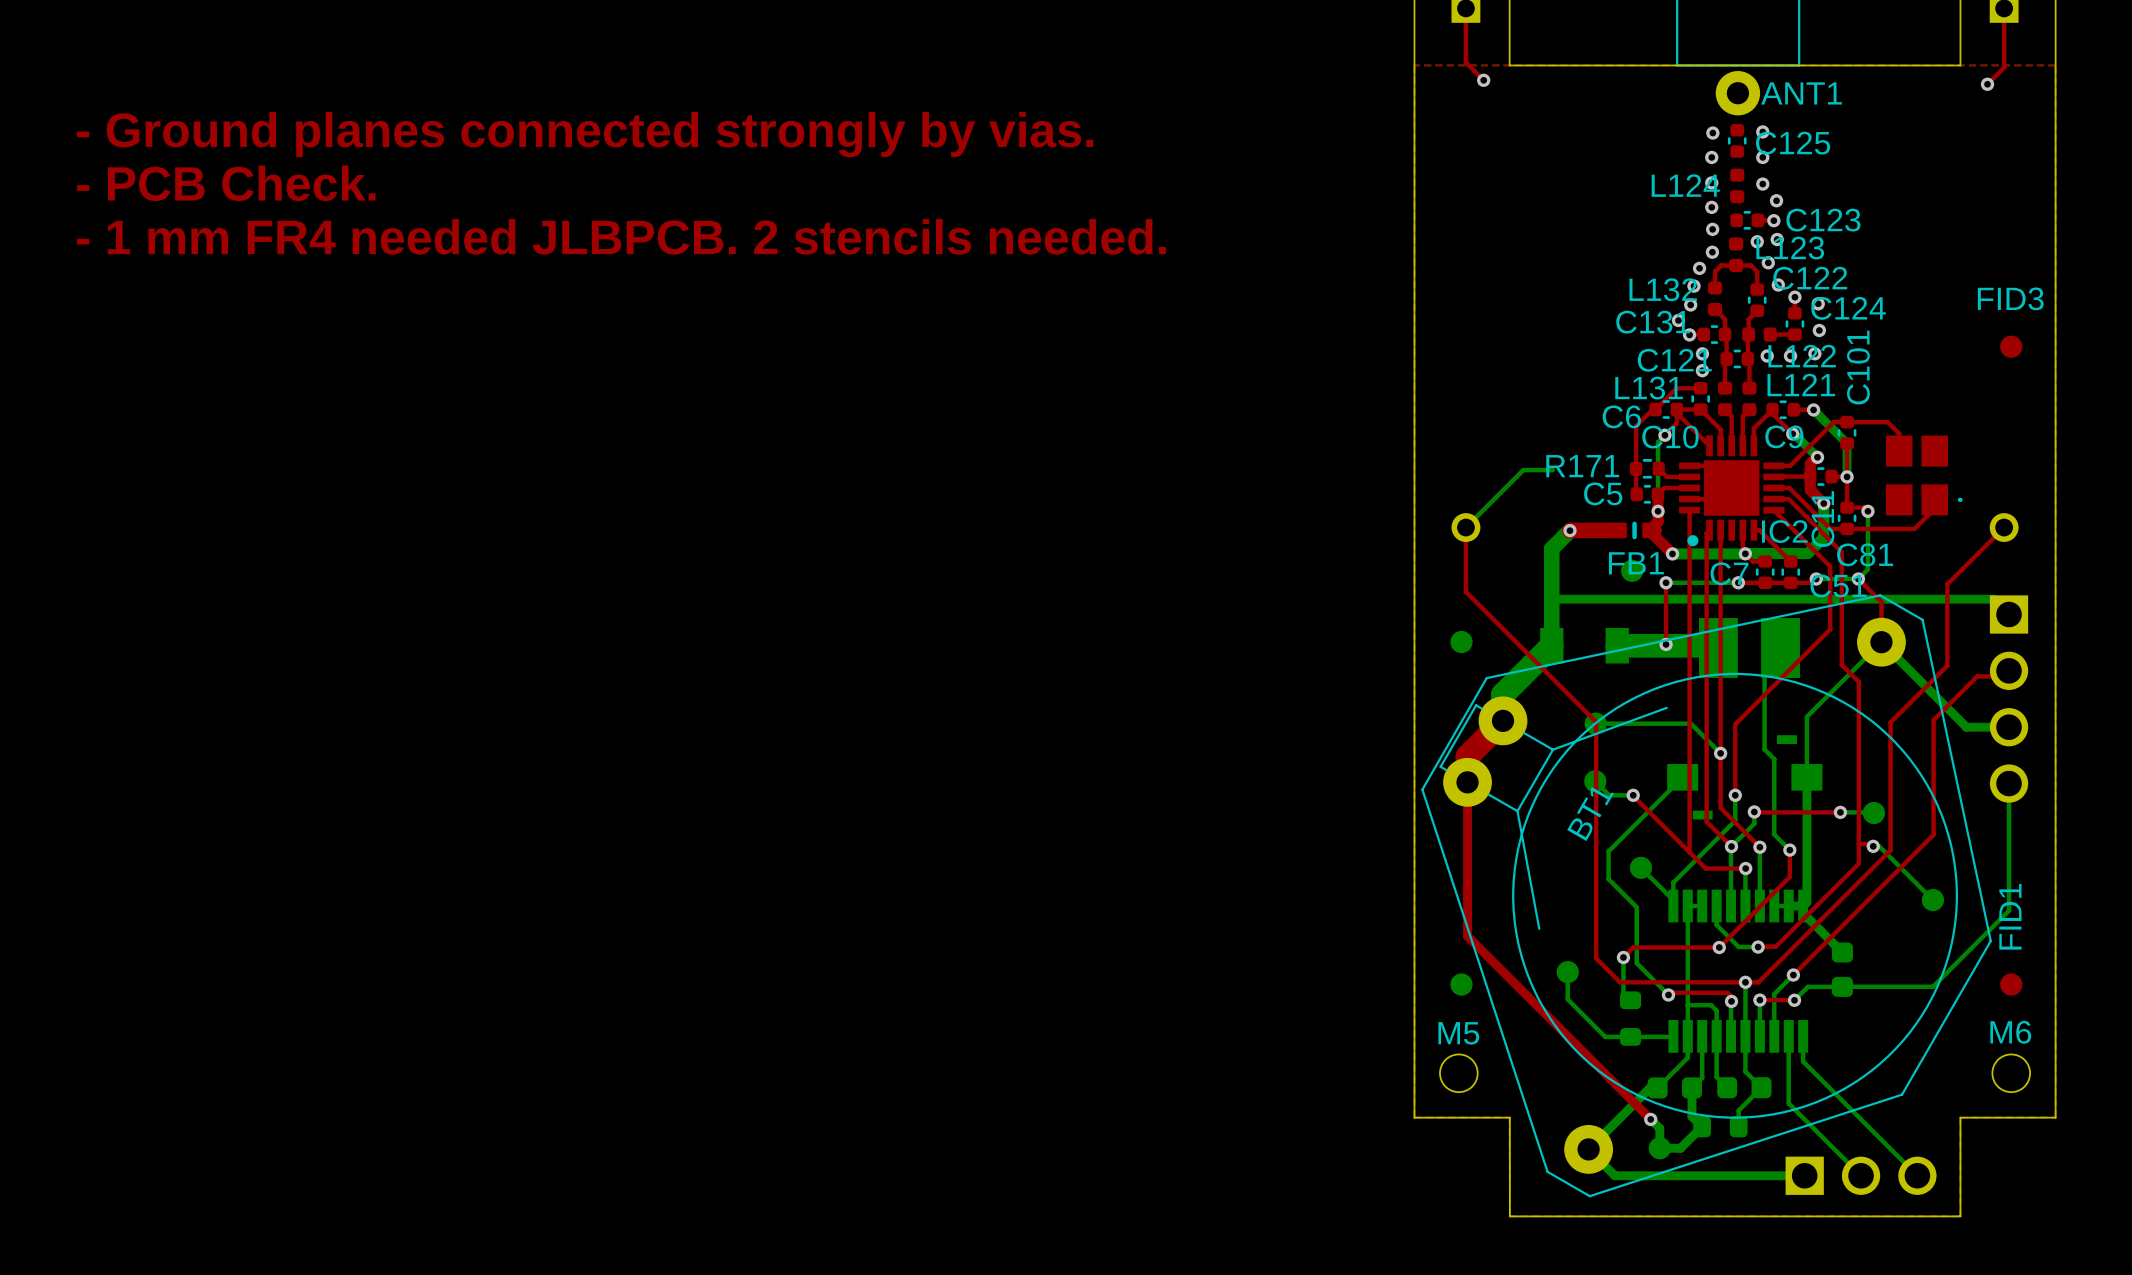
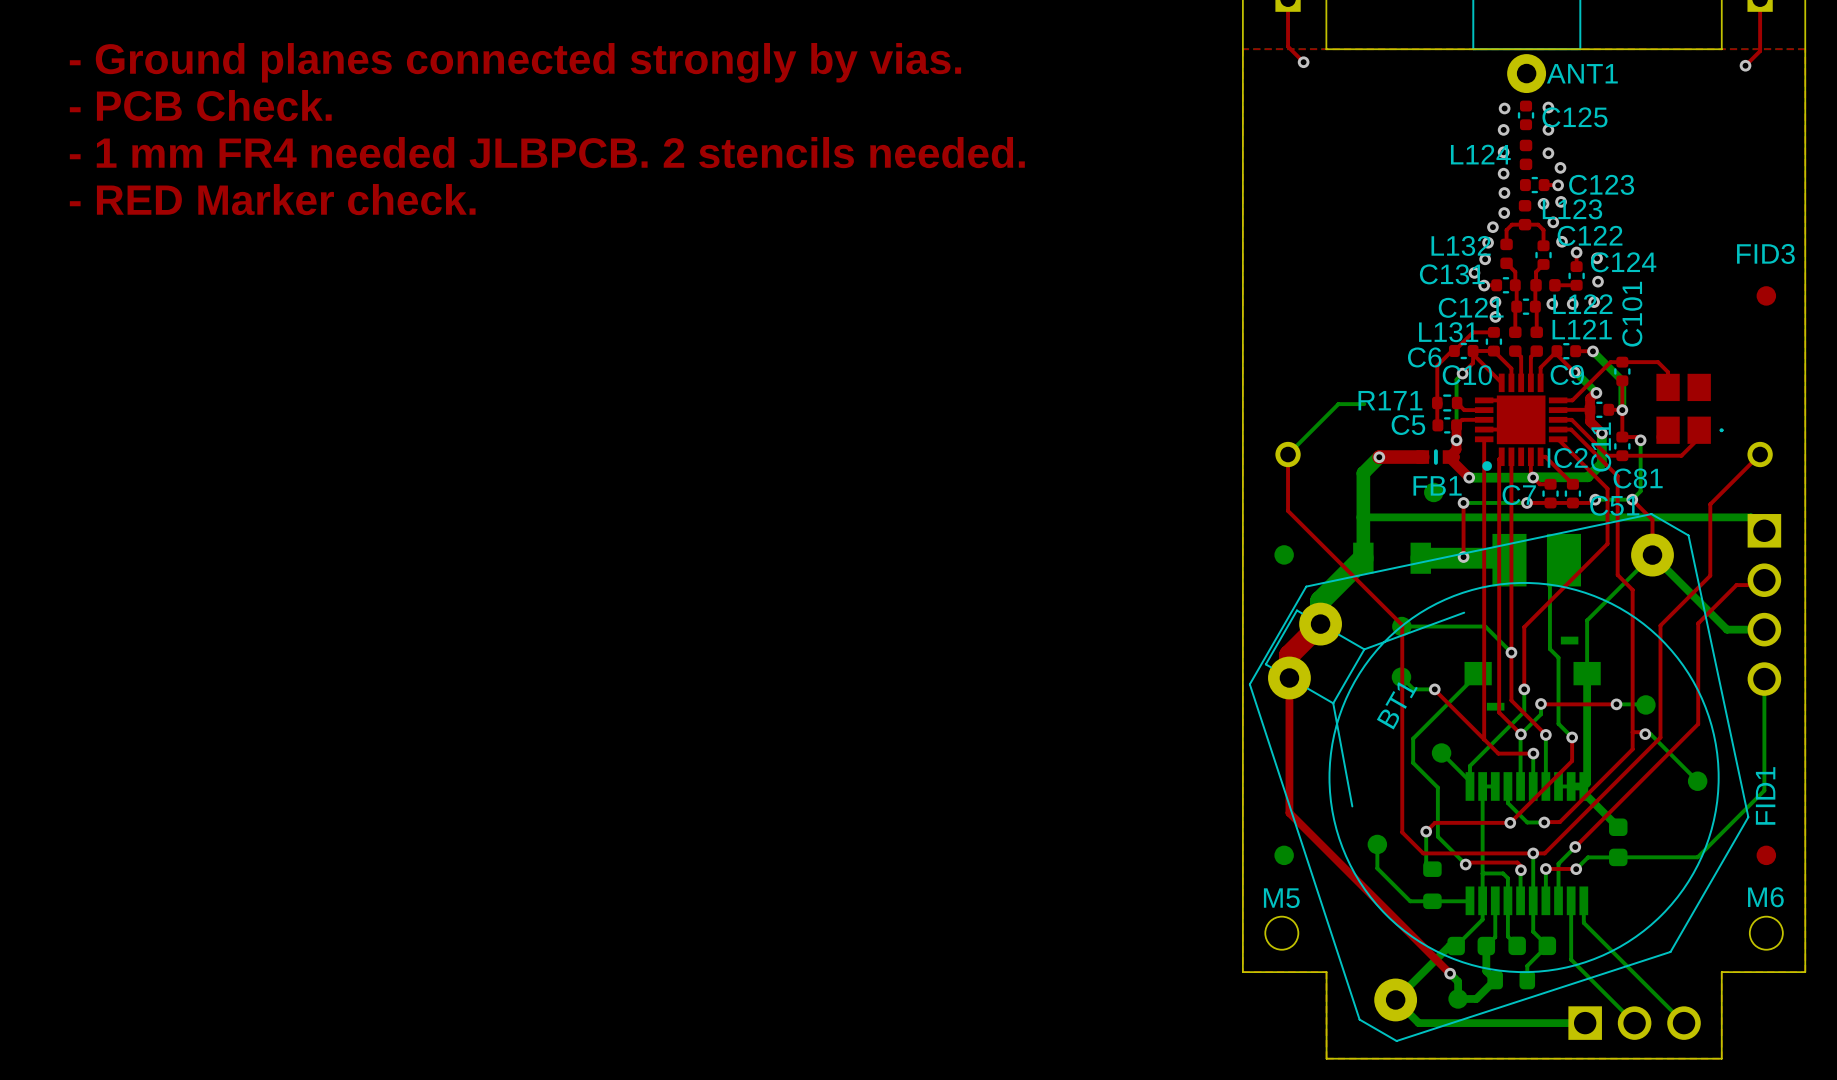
text: none -> - Ground planes connected strongly by vias. (515, 62)
text: - Ground planes connected strongly by vias. (585, 134) -> - PCB Check. (200, 105)
text: - PCB Check. (226, 183) -> - 1 mm FR4 needed JLBPCB. 2 stencils needed. (547, 152)
text: - 1 mm FR4 needed JLBPCB. 2 stencils needed. (621, 236) -> - RED Marker check. (272, 199)

